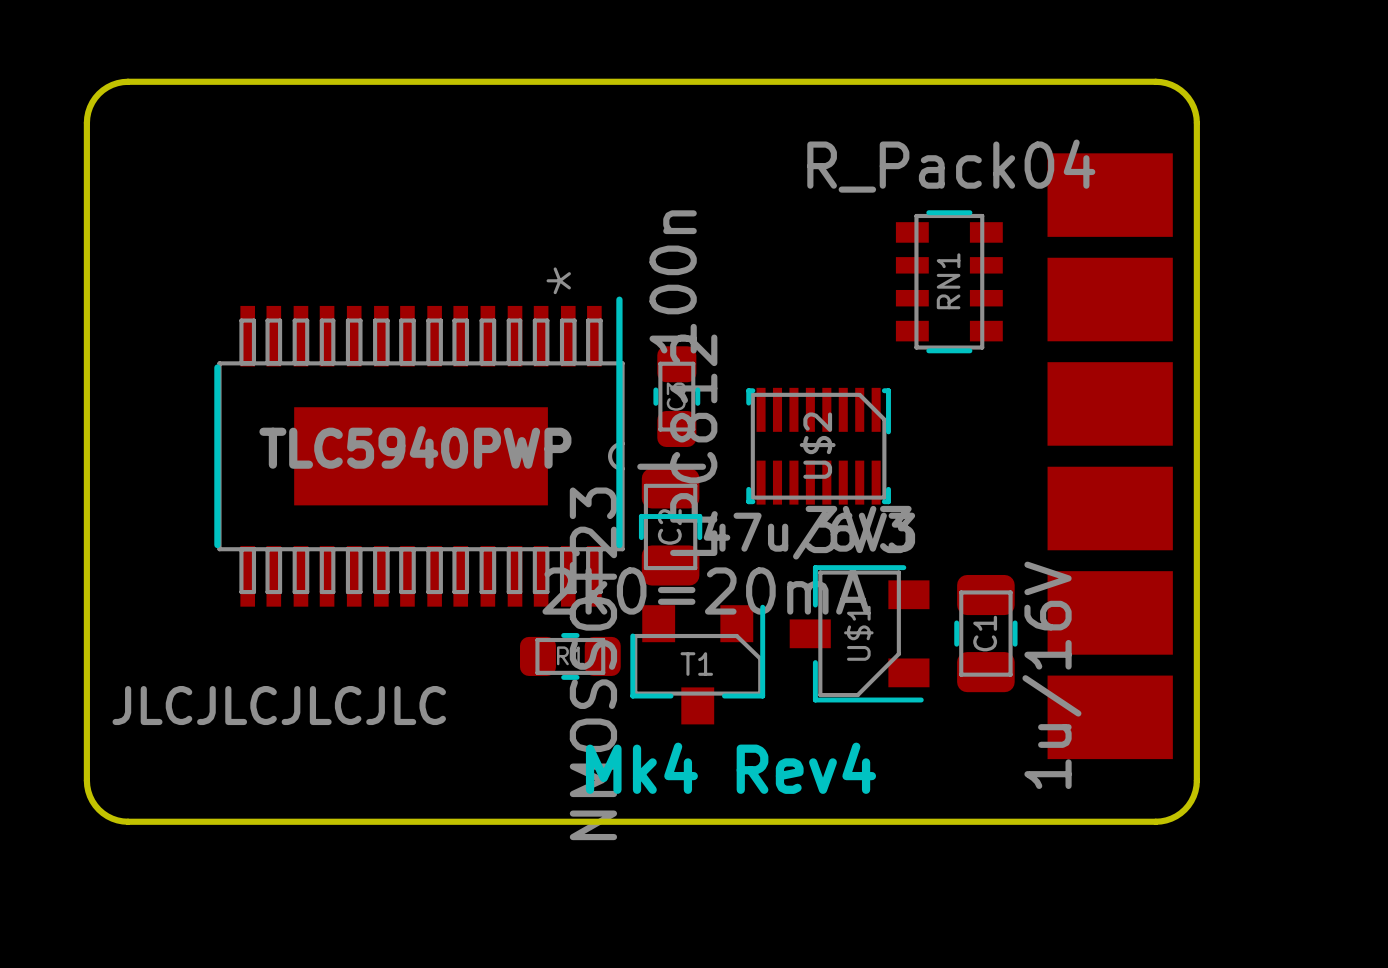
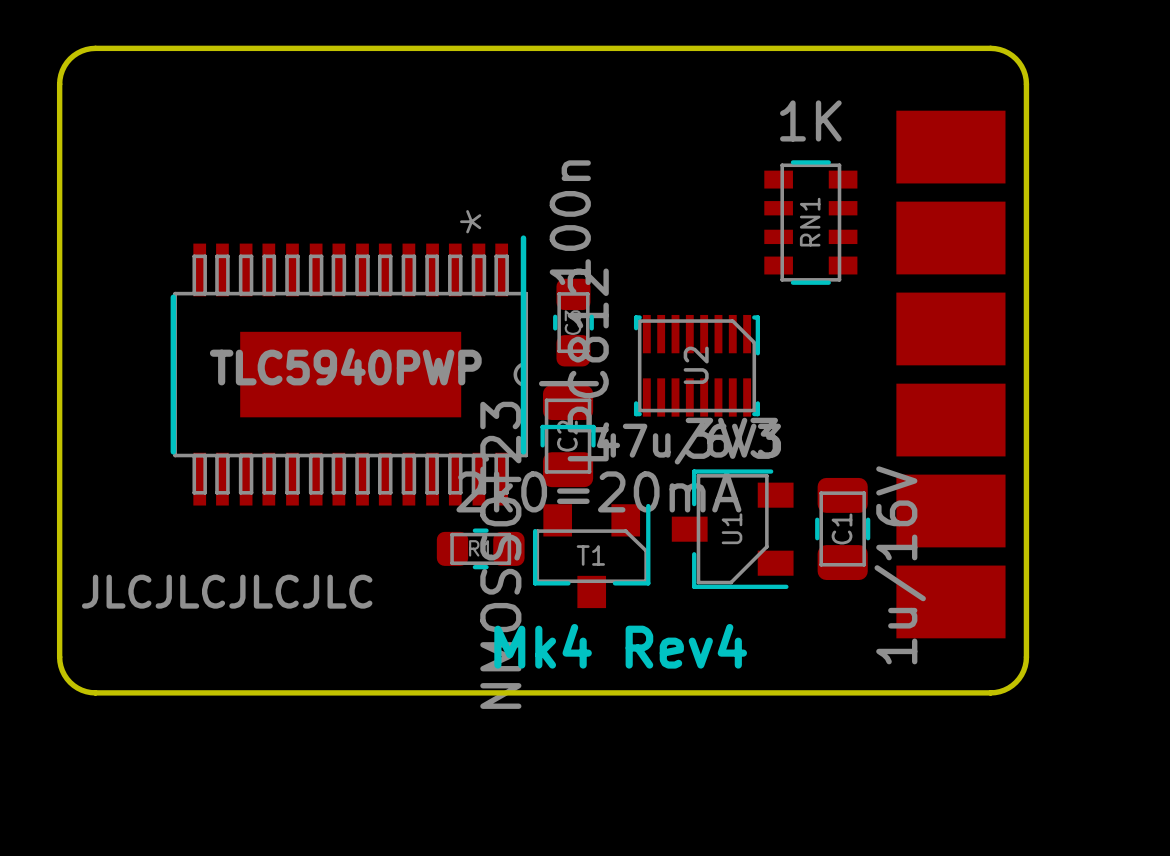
RN1 value: R_Pack04 (951, 166) -> 1K (810, 120)
U$2 name: U$2 (817, 445) -> U2 (696, 365)
U$1 name: U$1 (858, 633) -> U1 (732, 528)

